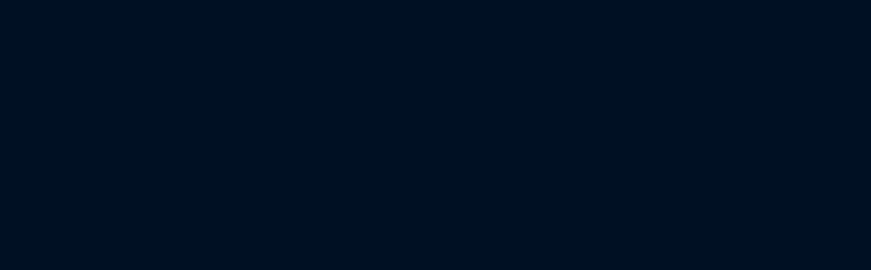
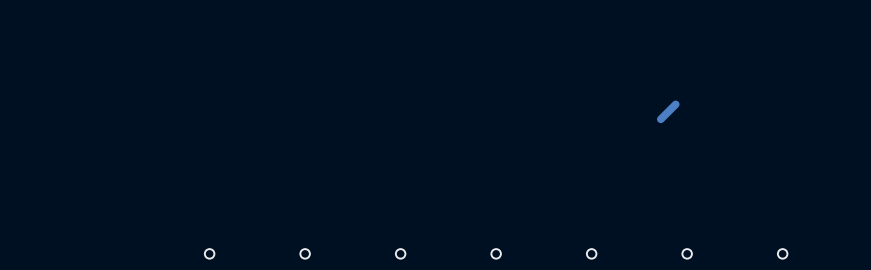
track: none -> (675, 104) (660, 119)
via: none -> (209, 253)
via: none -> (305, 253)
via: none -> (400, 253)
via: none -> (496, 253)
via: none -> (591, 253)
via: none -> (687, 253)
via: none -> (782, 253)

